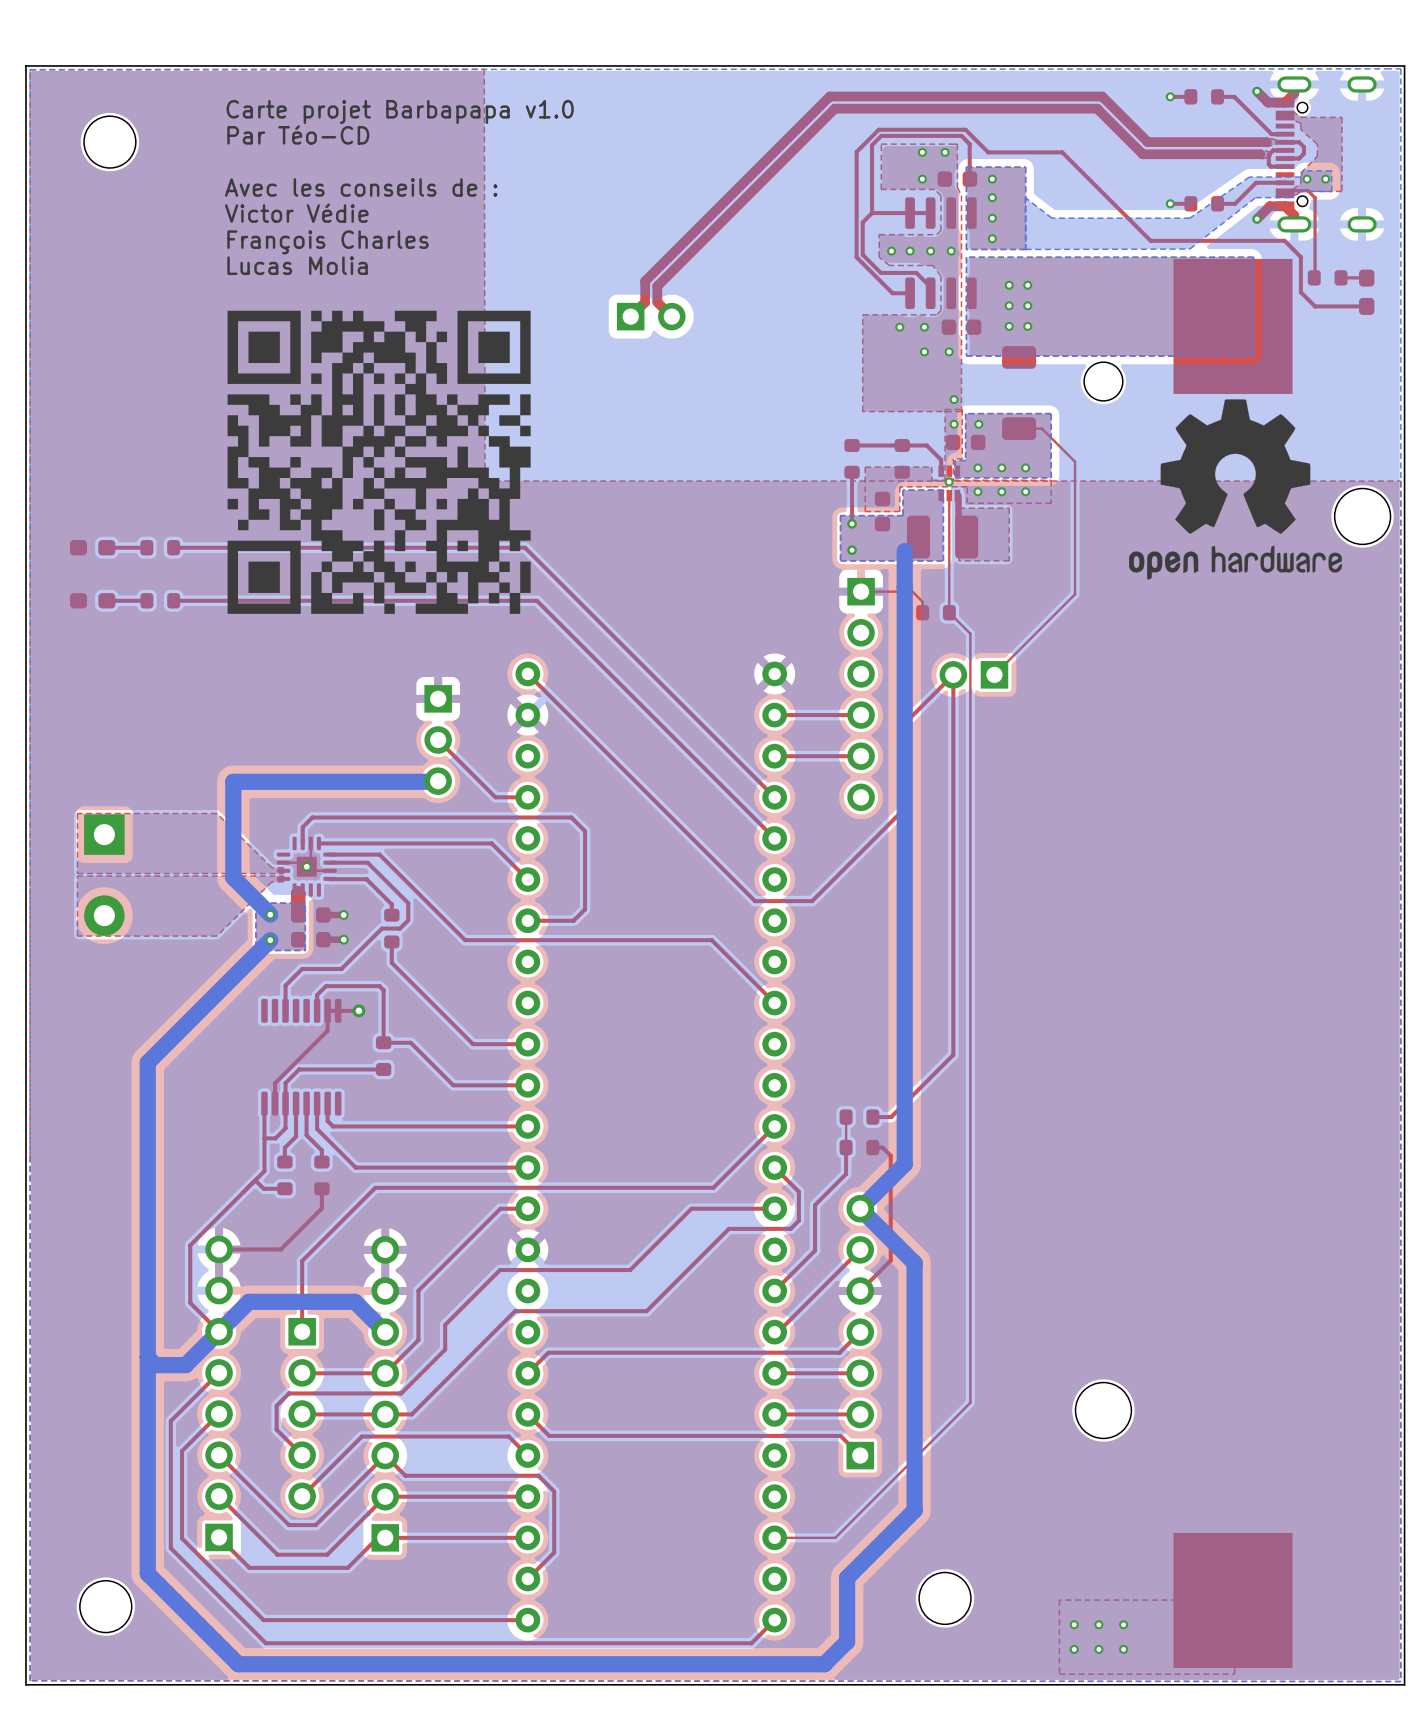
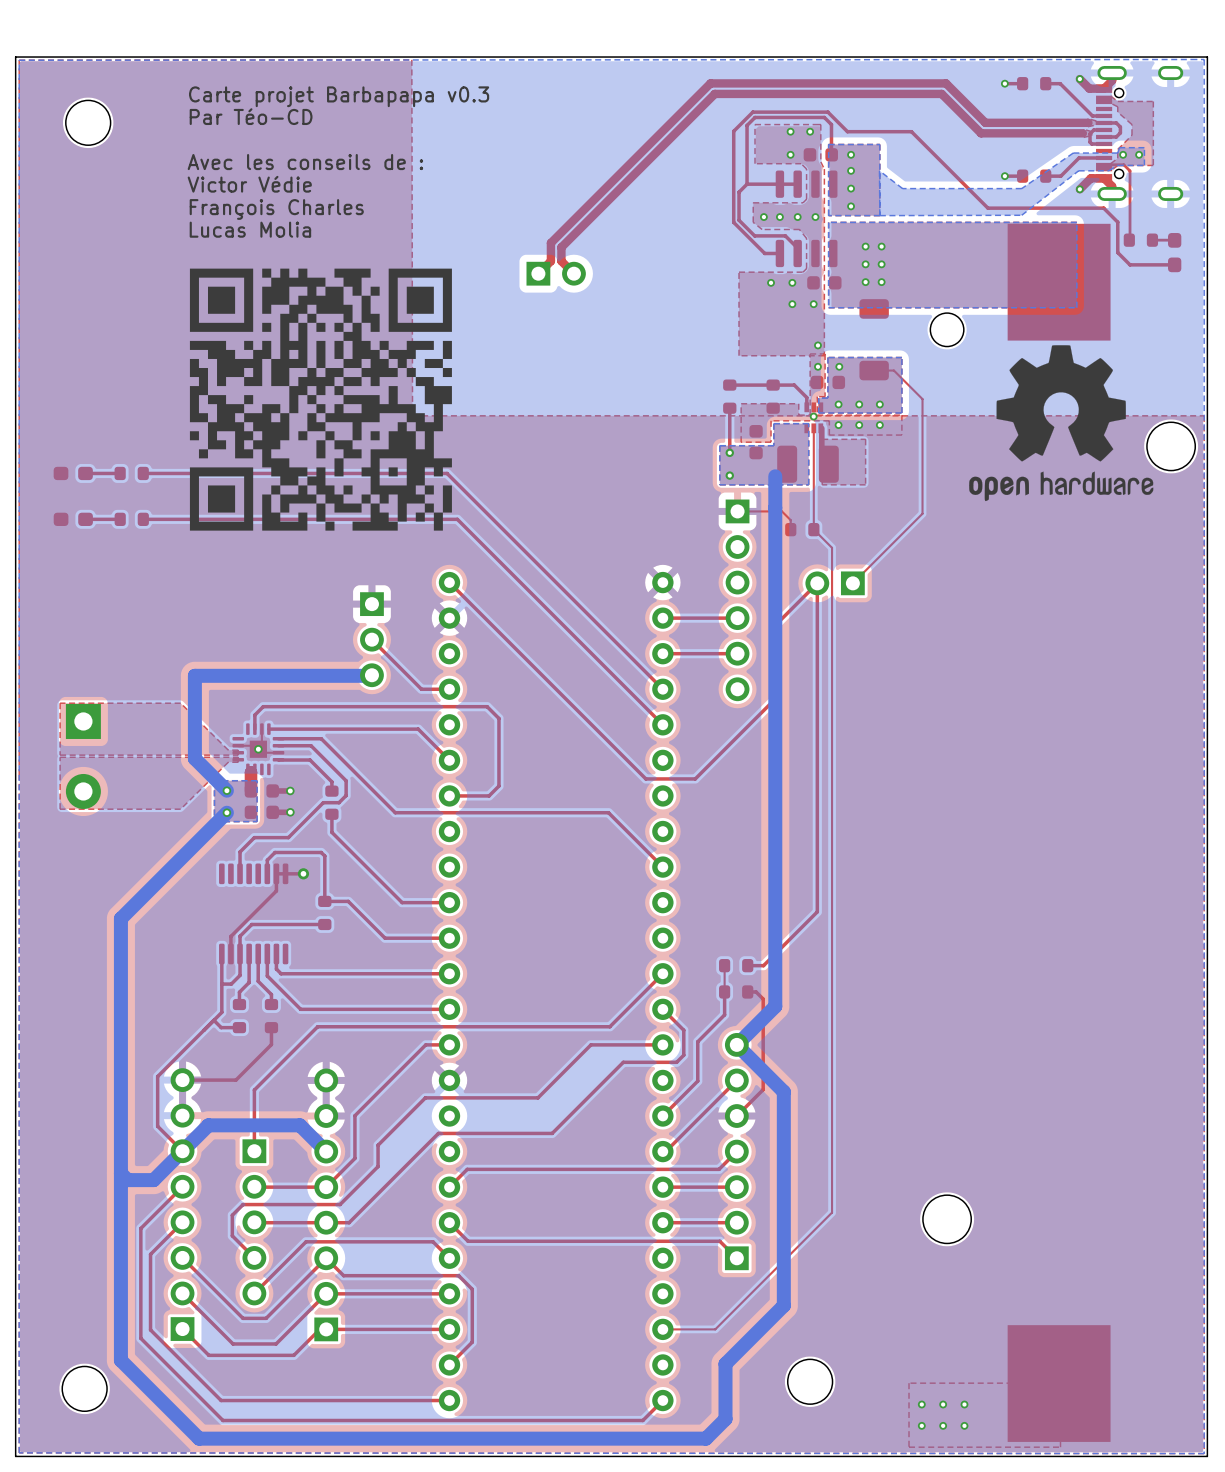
text: Carte projet Barbapapa v1.0 (400, 111) -> Carte projet Barbapapa v0.3 (339, 96)

